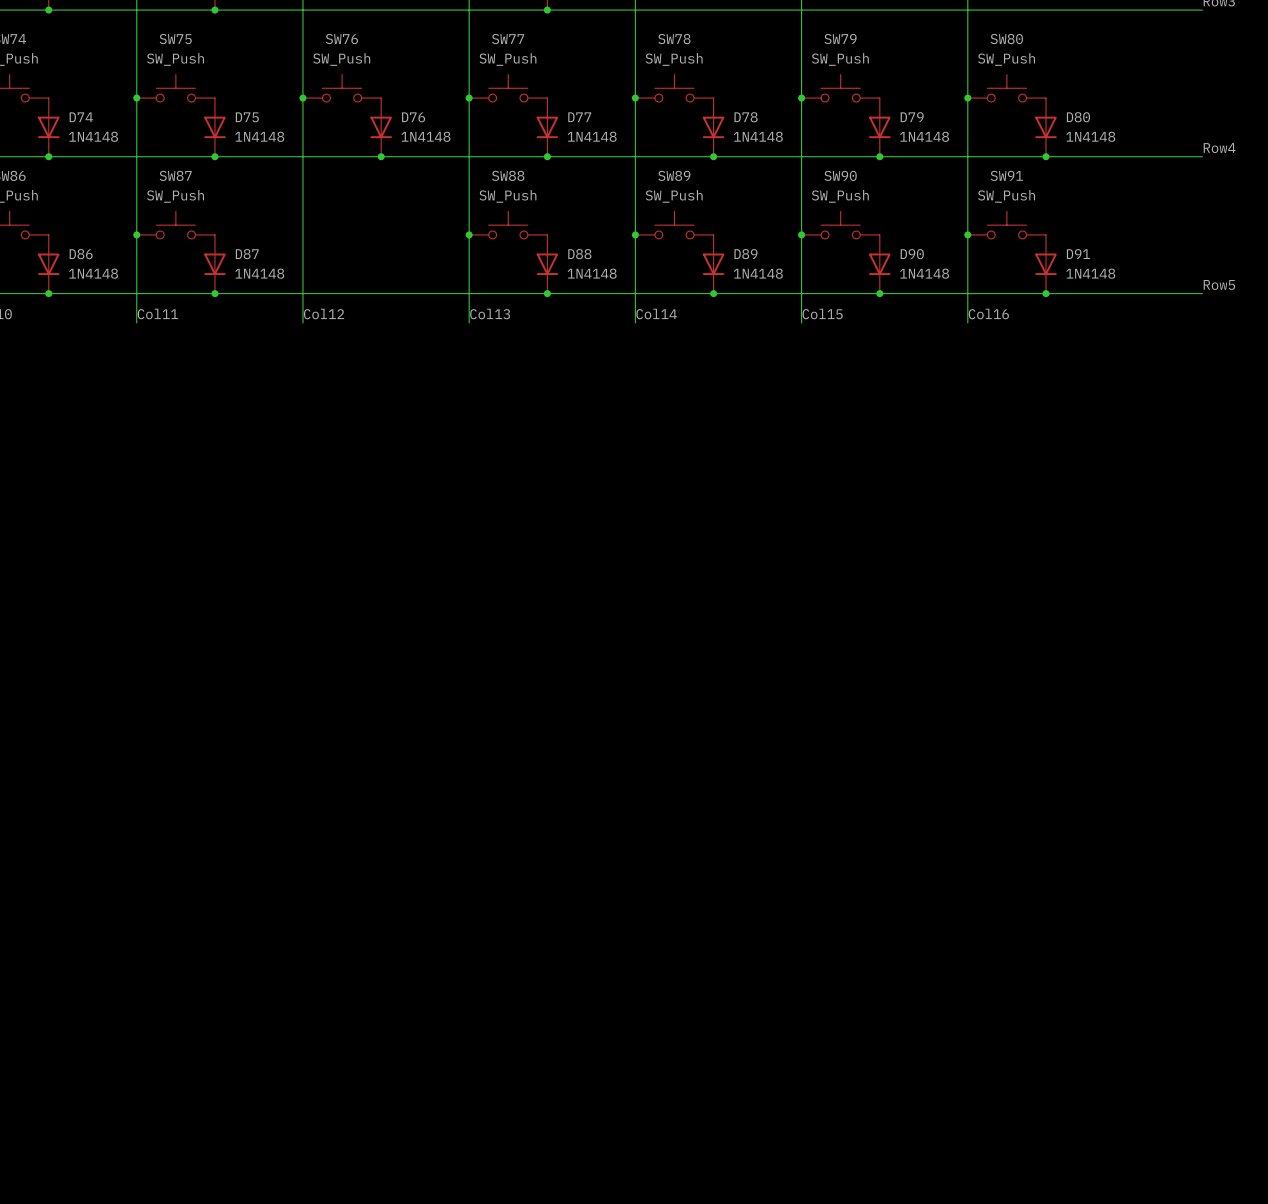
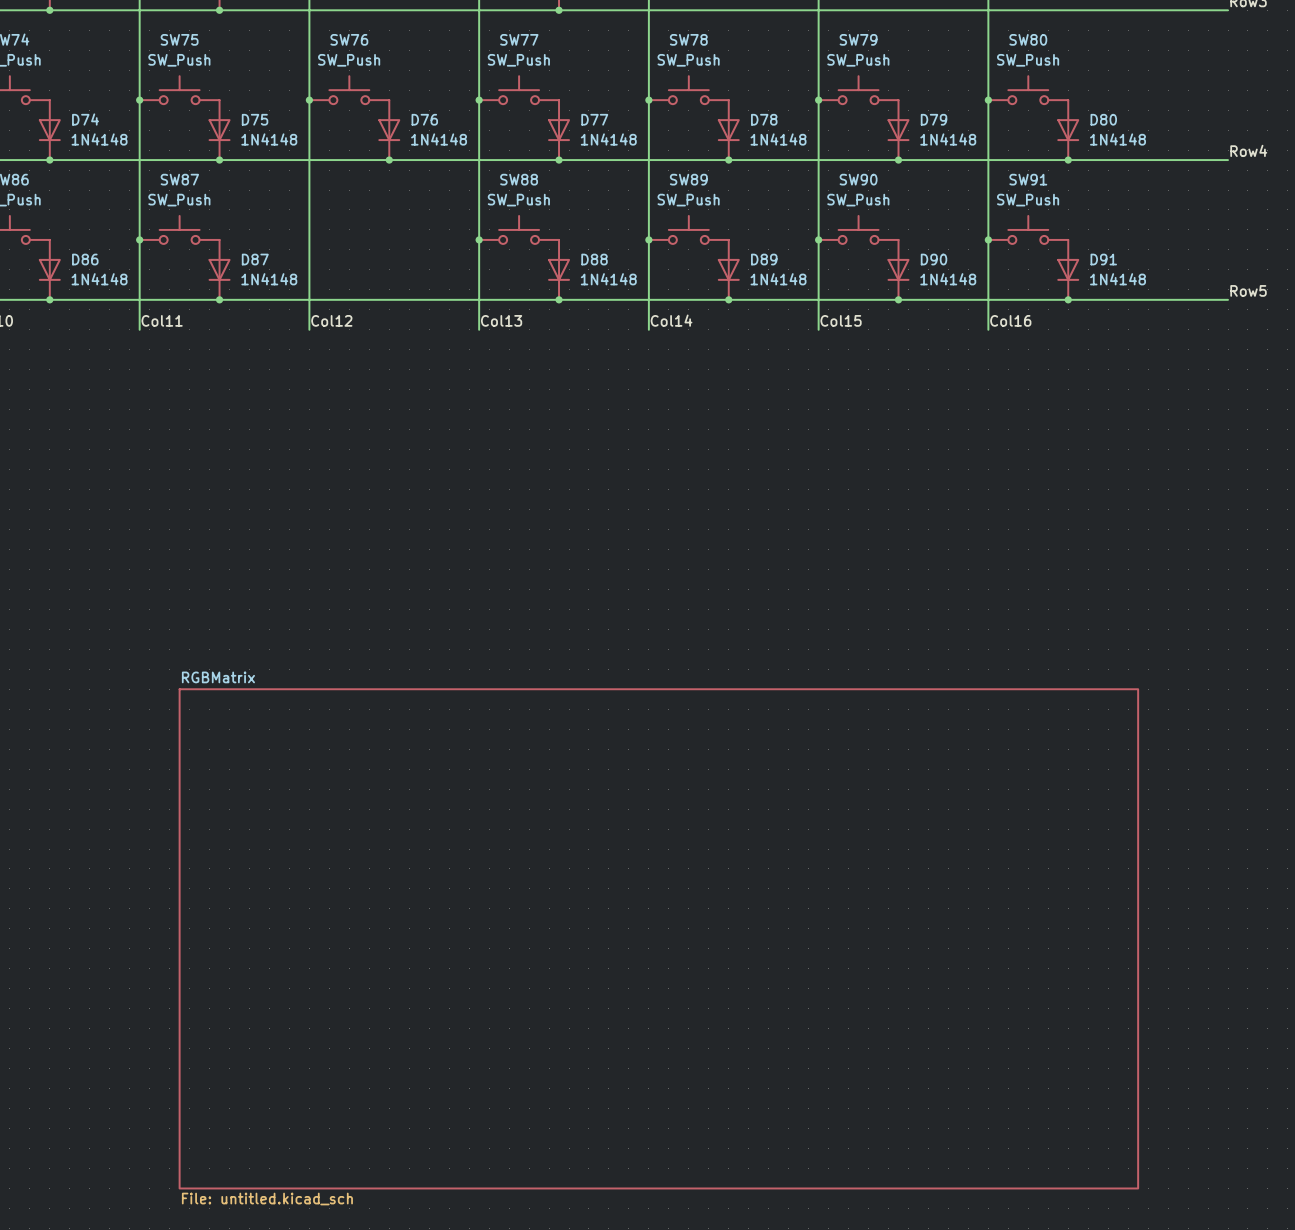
sheet RGBMatrix: none -> File: untitled.kicad_sch (658, 938)

